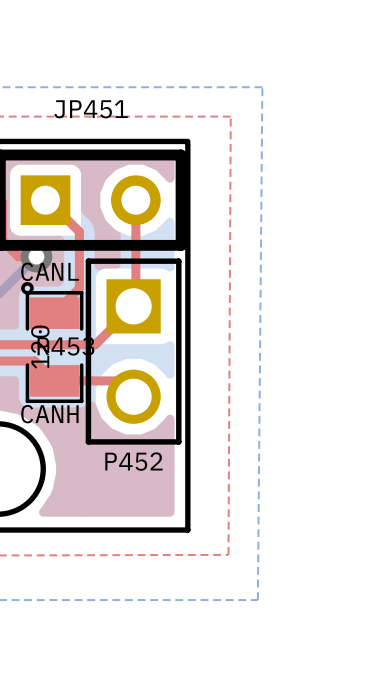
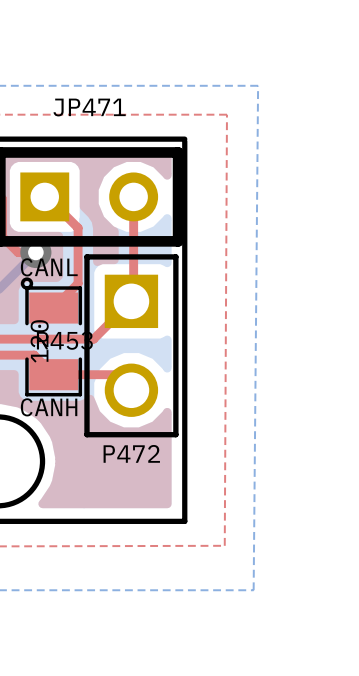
JP451 name: JP451 (91, 109) -> JP471 (89, 107)
P452 name: P452 (133, 461) -> P472 (131, 453)

